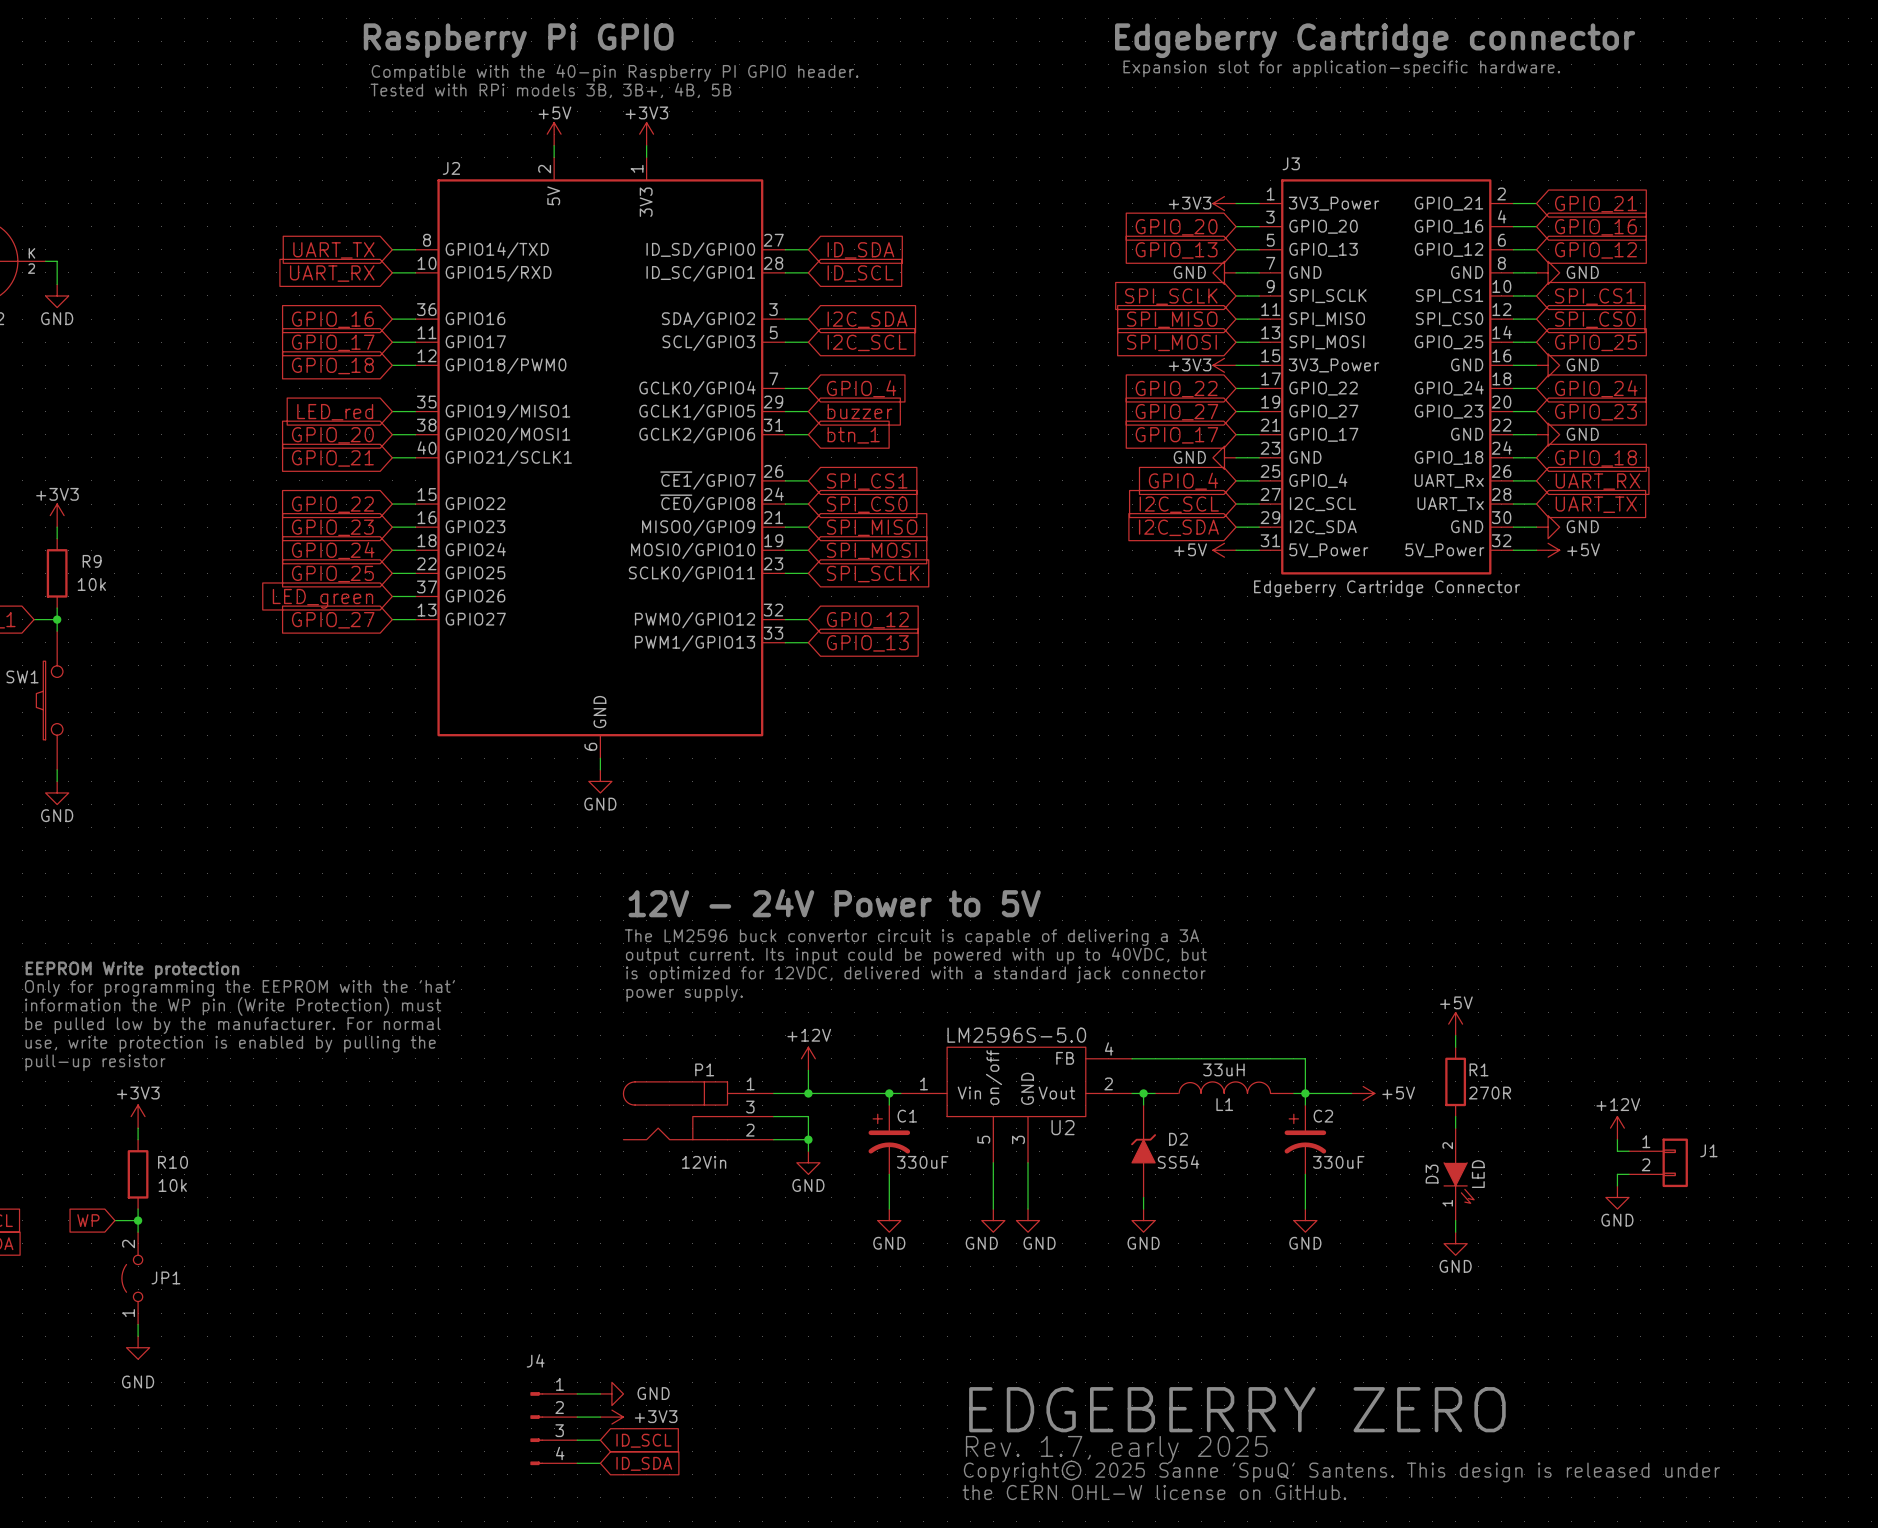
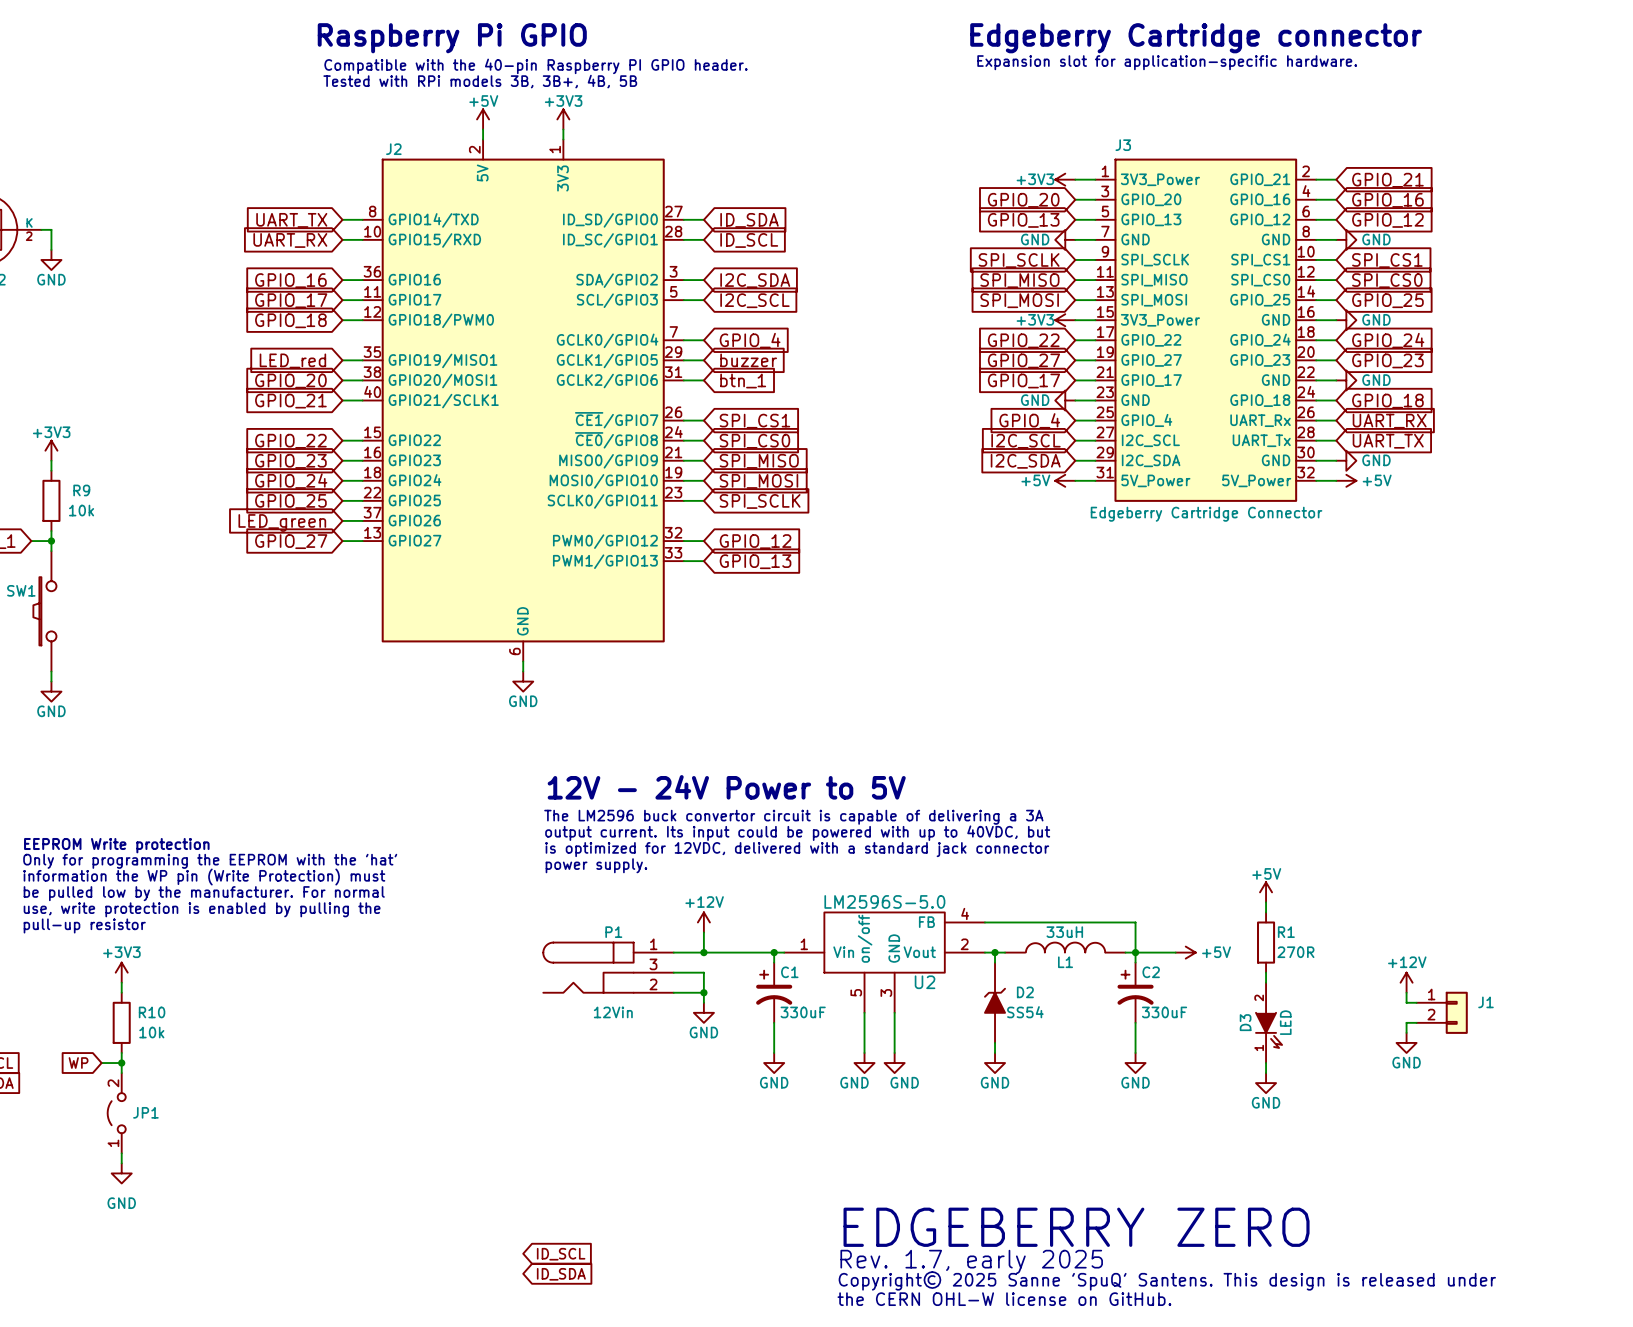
wire: (577, 1393) (600, 1393) -> none
power symbol: GND (611, 1393) -> none
wire: (577, 1417) (600, 1417) -> none
power symbol: +3V3 (611, 1417) -> none
J4: (553, 1428) -> none
wire: (577, 1440) (600, 1440) -> none
wire: (577, 1463) (600, 1463) -> none

